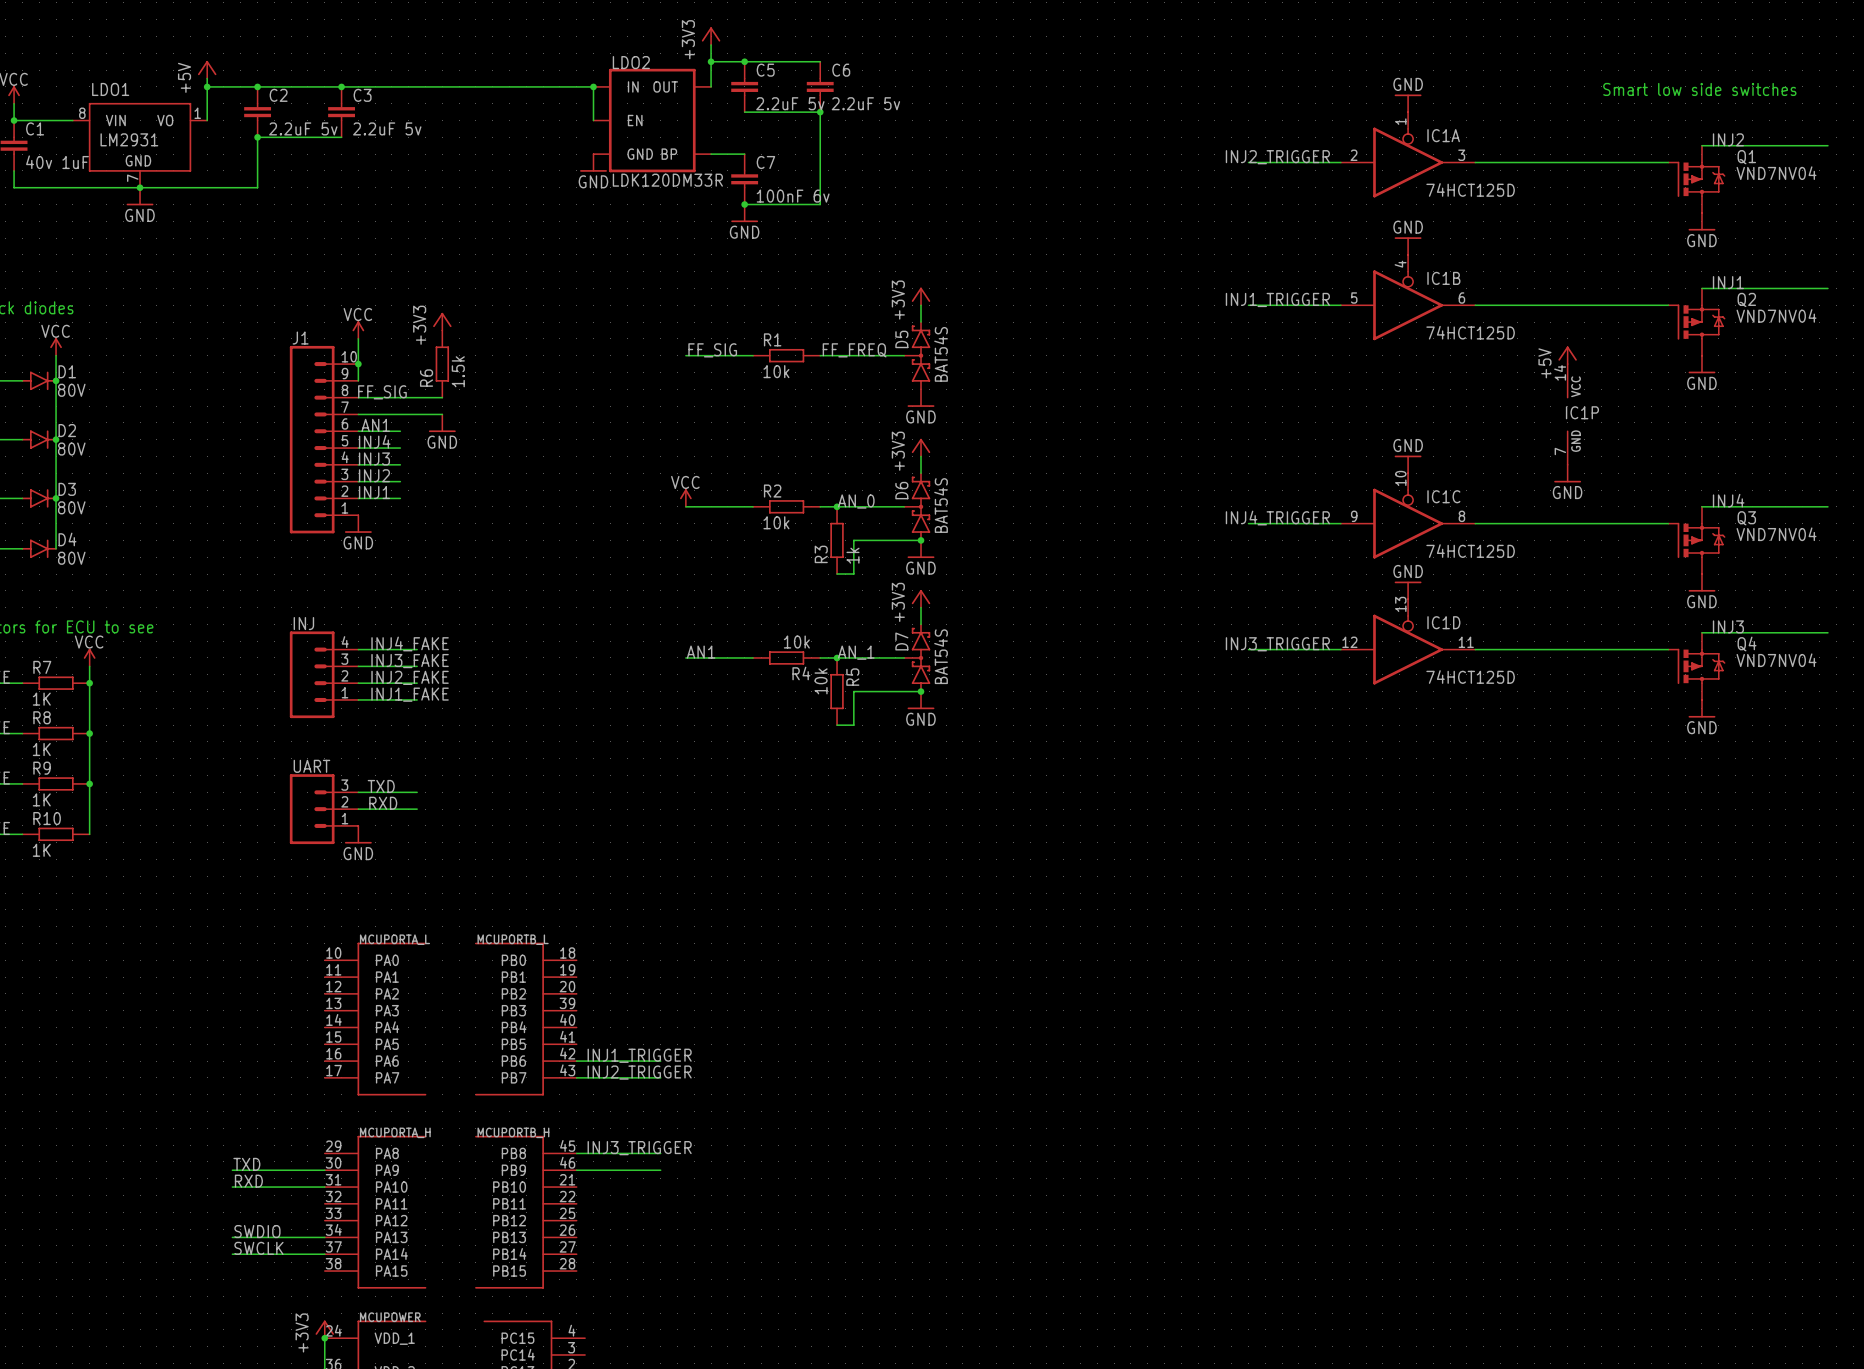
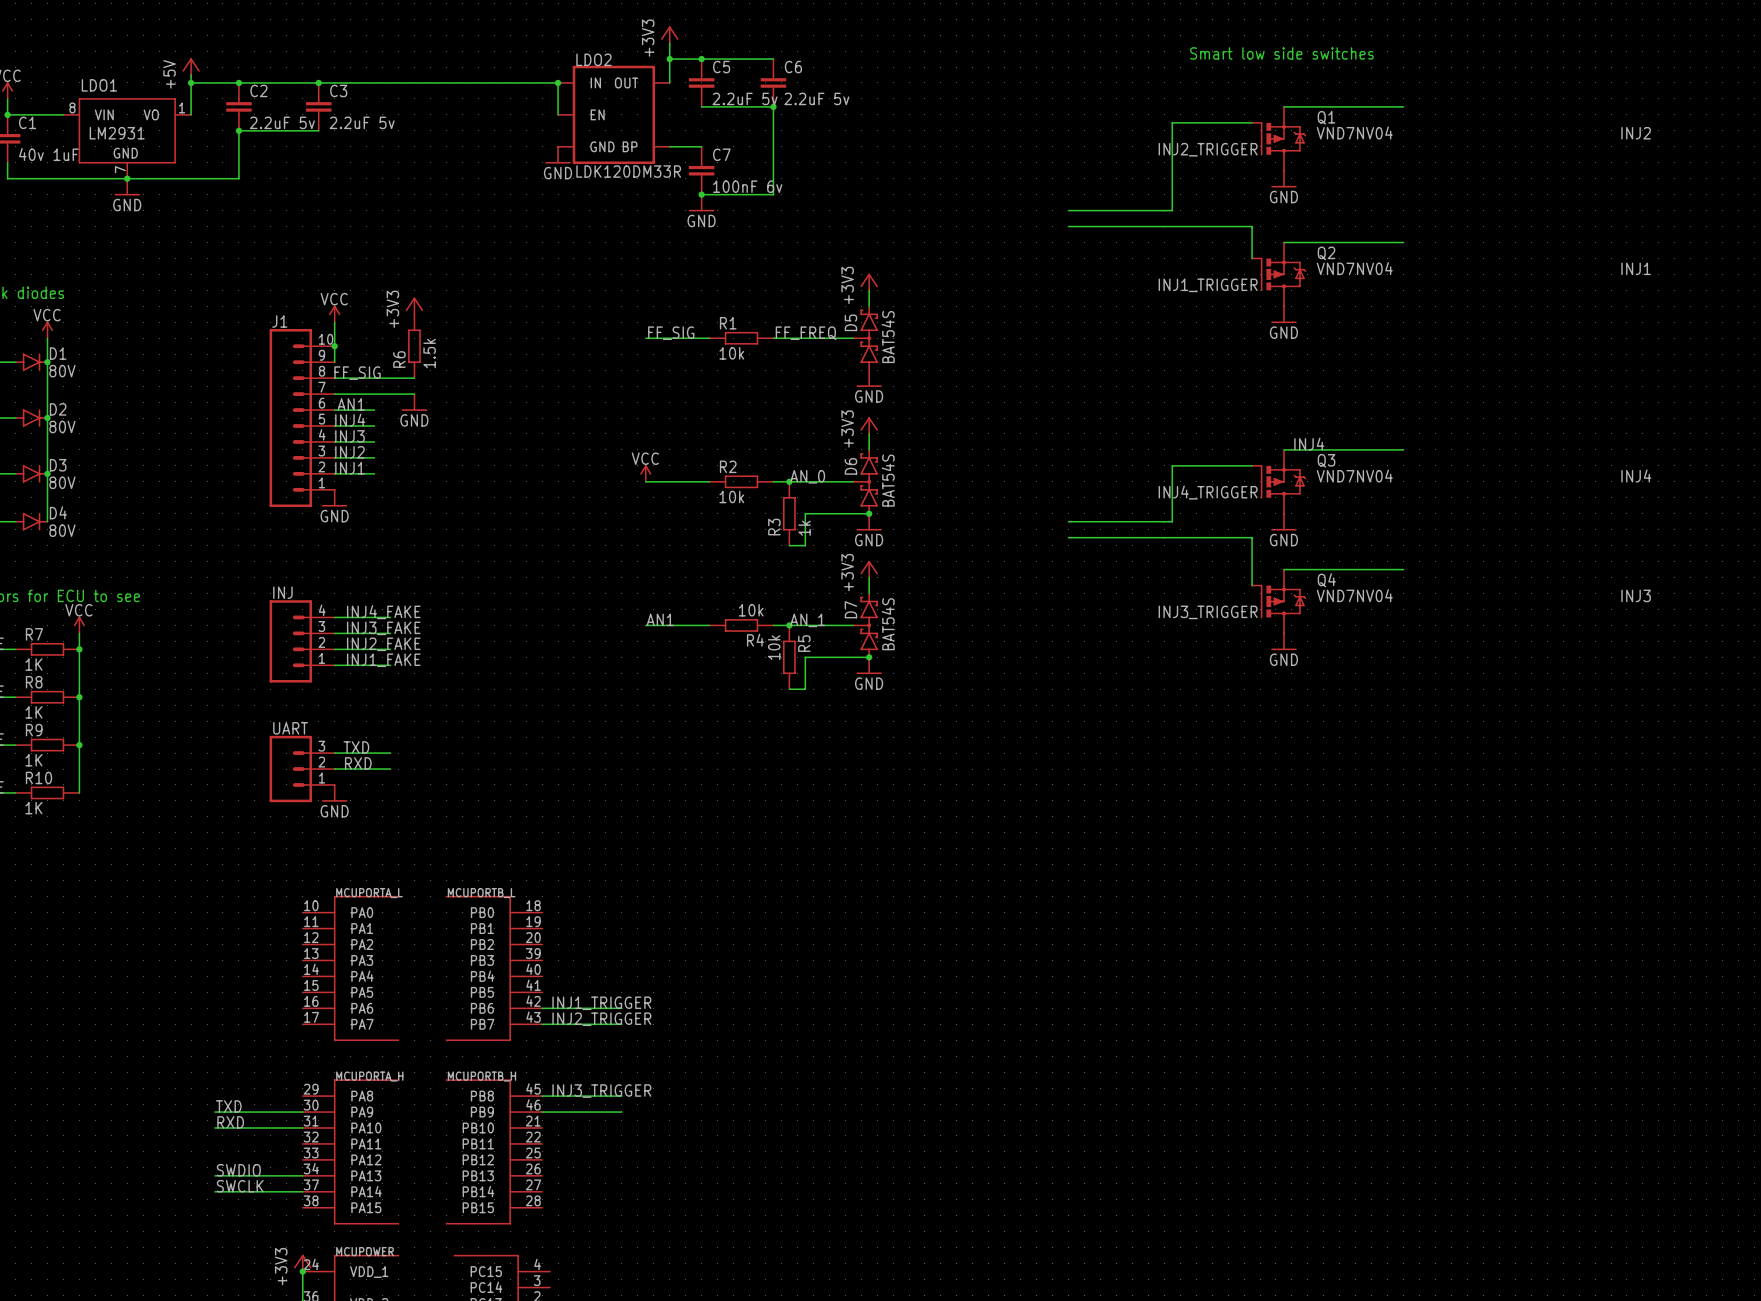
text: none -> Smart low side switches (1281, 53)
text: Smart low side switches (1699, 89) -> none
power symbol: GND (1408, 103) -> none
wire: none -> (1283, 106) (1403, 106)
wire: none -> (1252, 122) (1172, 122) (1172, 210) (1068, 210)
wire: (1701, 145) (1827, 145) -> none
IC1A: 74HCT125D (1408, 154) -> none
wire: (1248, 162) (1340, 162) -> none
wire: (1475, 162) (1668, 162) -> none
Q1 position: (1696, 179) -> (1278, 138)
power symbol: none -> GND (1283, 179)
power symbol: GND (1701, 221) -> none
wire: none -> (1068, 226) (1252, 226) (1252, 258)
power symbol: GND (1408, 246) -> none
wire: none -> (1283, 242) (1403, 242)
wire: (1701, 288) (1827, 288) -> none
IC1B: 74HCT125D (1408, 297) -> none
wire: (1248, 305) (1340, 305) -> none
wire: (1475, 305) (1668, 305) -> none
Q2 position: (1696, 322) -> (1278, 274)
power symbol: none -> GND (1283, 314)
power symbol: +5V (1567, 355) -> none
power symbol: GND (1701, 364) -> none
IC1P: (1567, 414) -> none
power symbol: GND (1408, 464) -> none
label: none -> INJ4 (1309, 444)
wire: none -> (1283, 449) (1403, 449)
power symbol: GND (1567, 473) -> none
wire: none -> (1252, 465) (1172, 465) (1172, 521) (1068, 521)
wire: (1701, 506) (1827, 506) -> none
IC1C: 74HCT125D (1408, 515) -> none
wire: (1248, 523) (1340, 523) -> none
wire: (1475, 523) (1668, 523) -> none
Q3 position: (1696, 540) -> (1278, 481)
power symbol: none -> GND (1283, 522)
wire: none -> (1068, 537) (1252, 537) (1252, 585)
power symbol: GND (1701, 582) -> none
power symbol: GND (1408, 590) -> none
wire: none -> (1283, 569) (1403, 569)
wire: (1701, 632) (1827, 632) -> none
IC1D: 74HCT125D (1408, 641) -> none
wire: (1248, 649) (1340, 649) -> none
wire: (1475, 649) (1668, 649) -> none
Q4 position: (1696, 666) -> (1278, 601)
power symbol: none -> GND (1283, 641)
power symbol: GND (1701, 708) -> none

